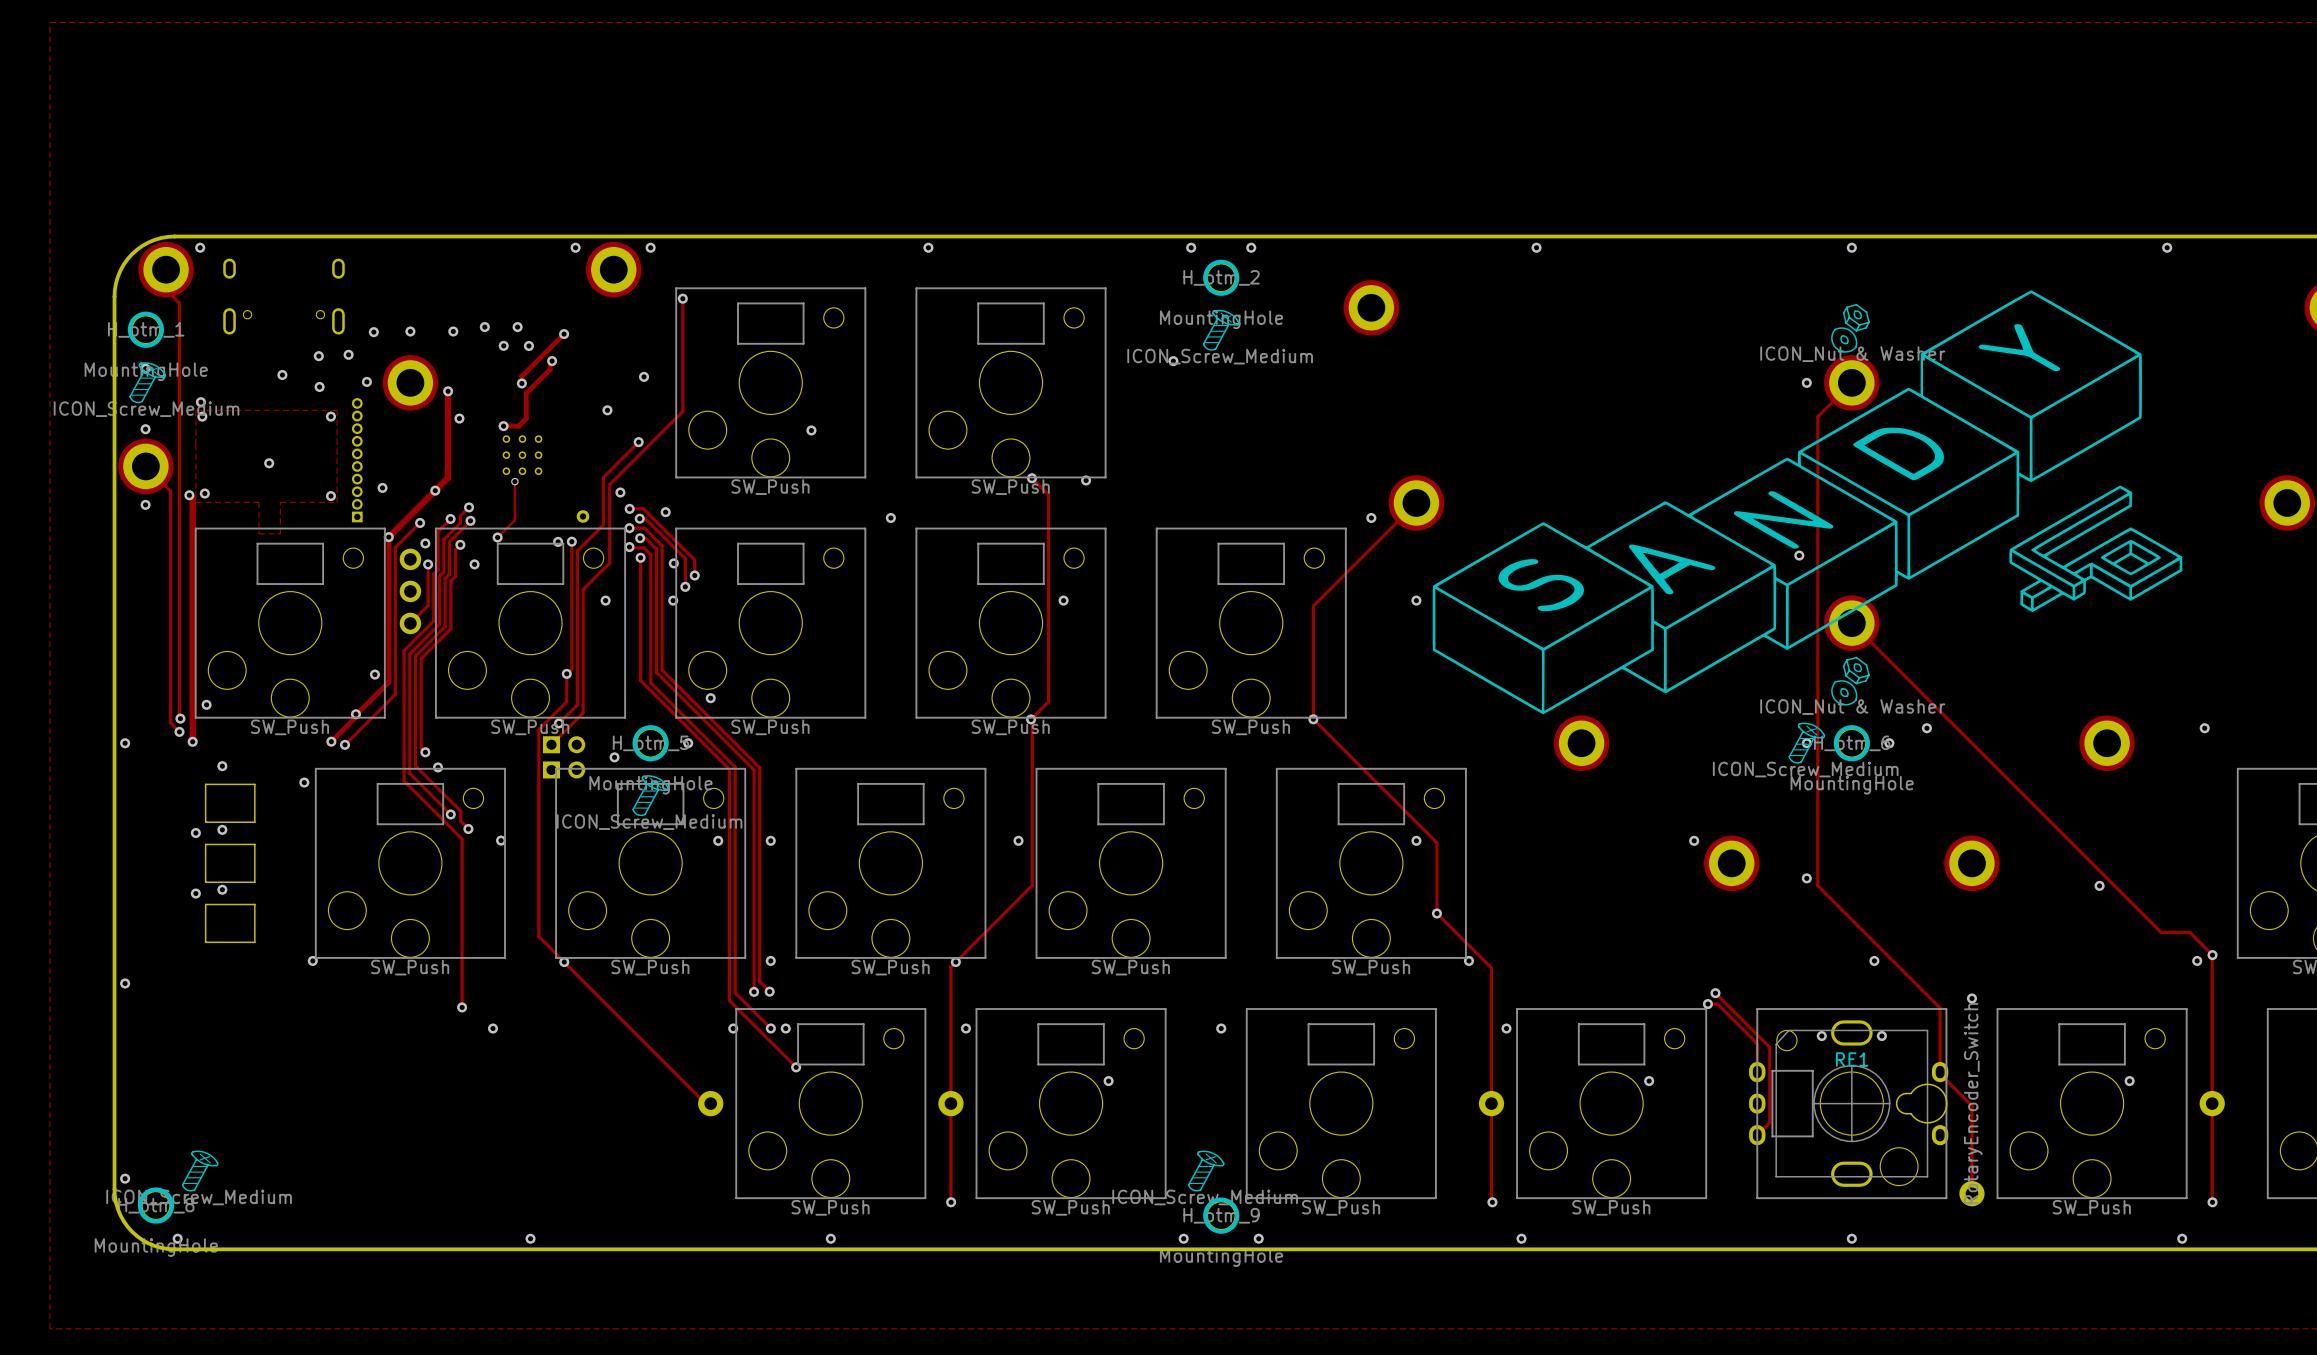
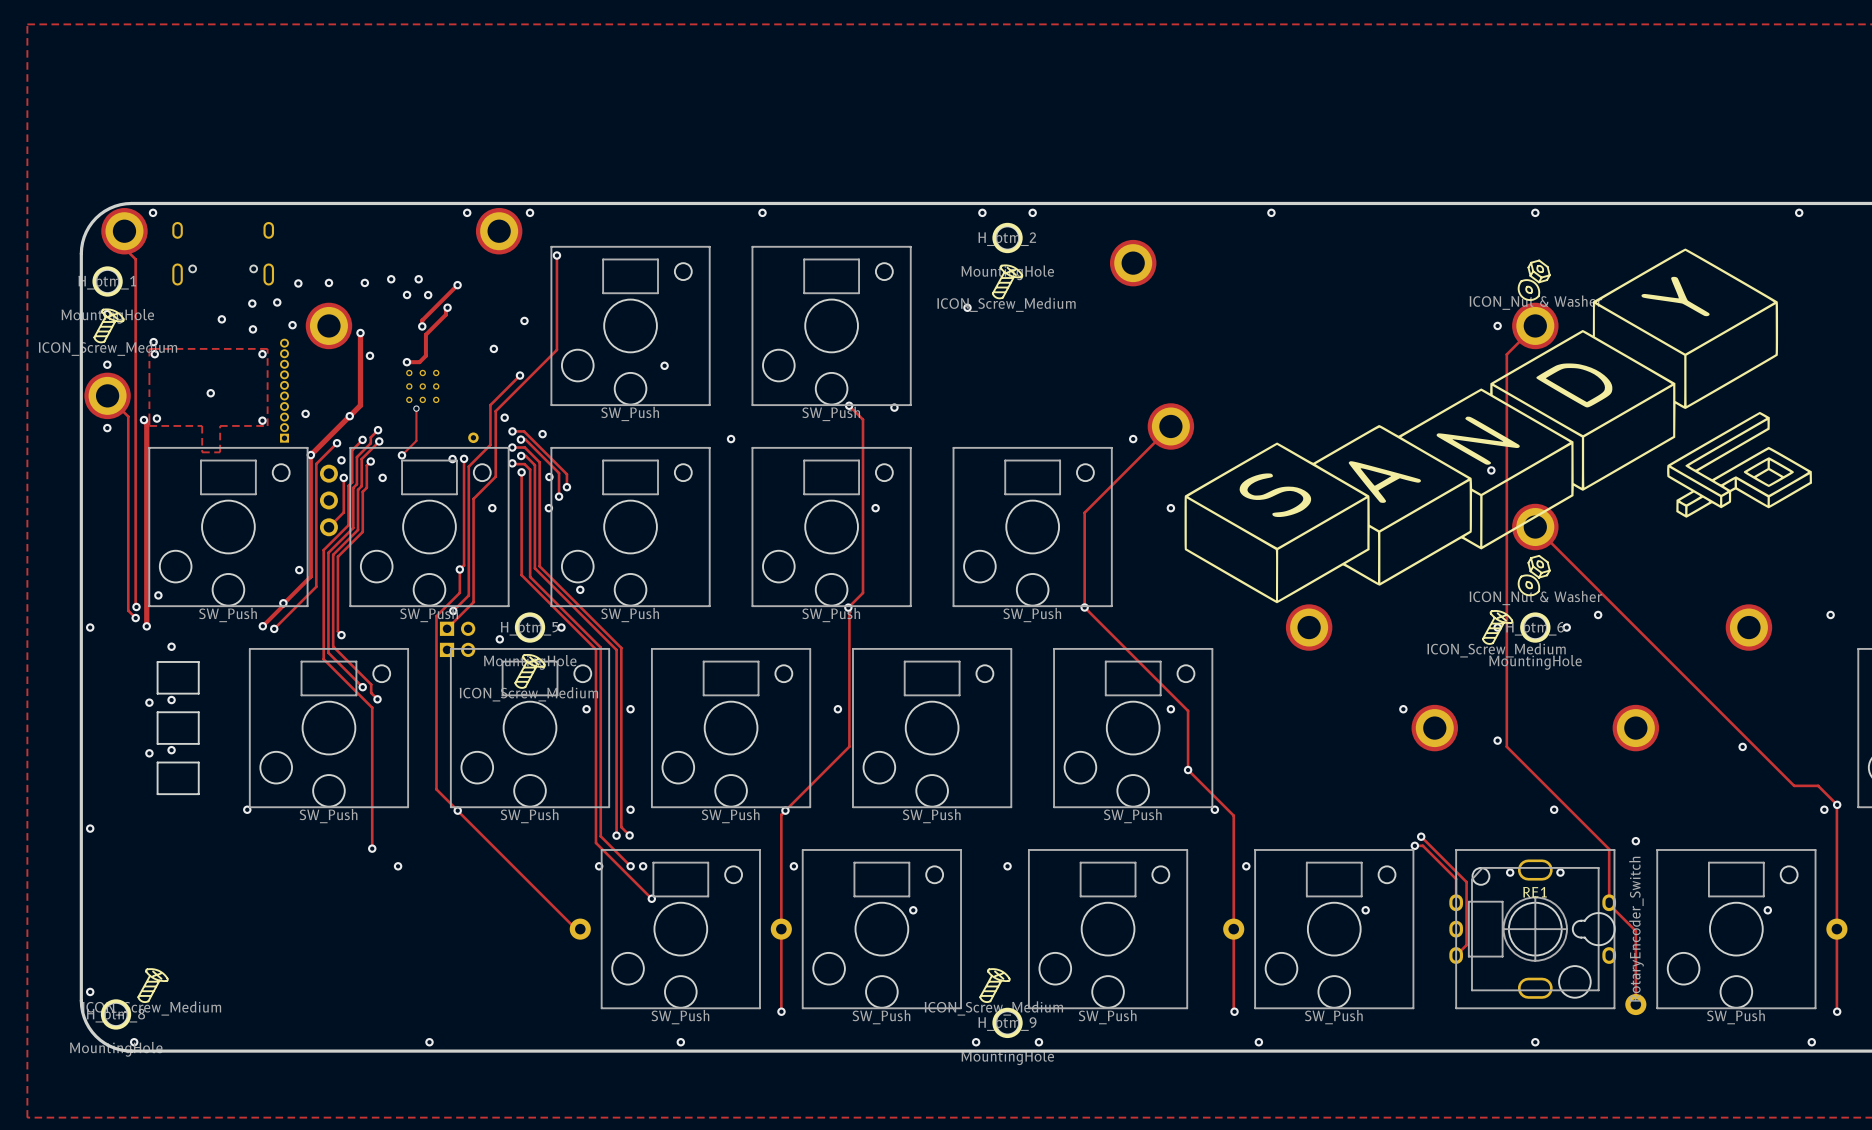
via: (438, 767) -> none
via: (304, 782) -> none
via: (501, 840) -> none

